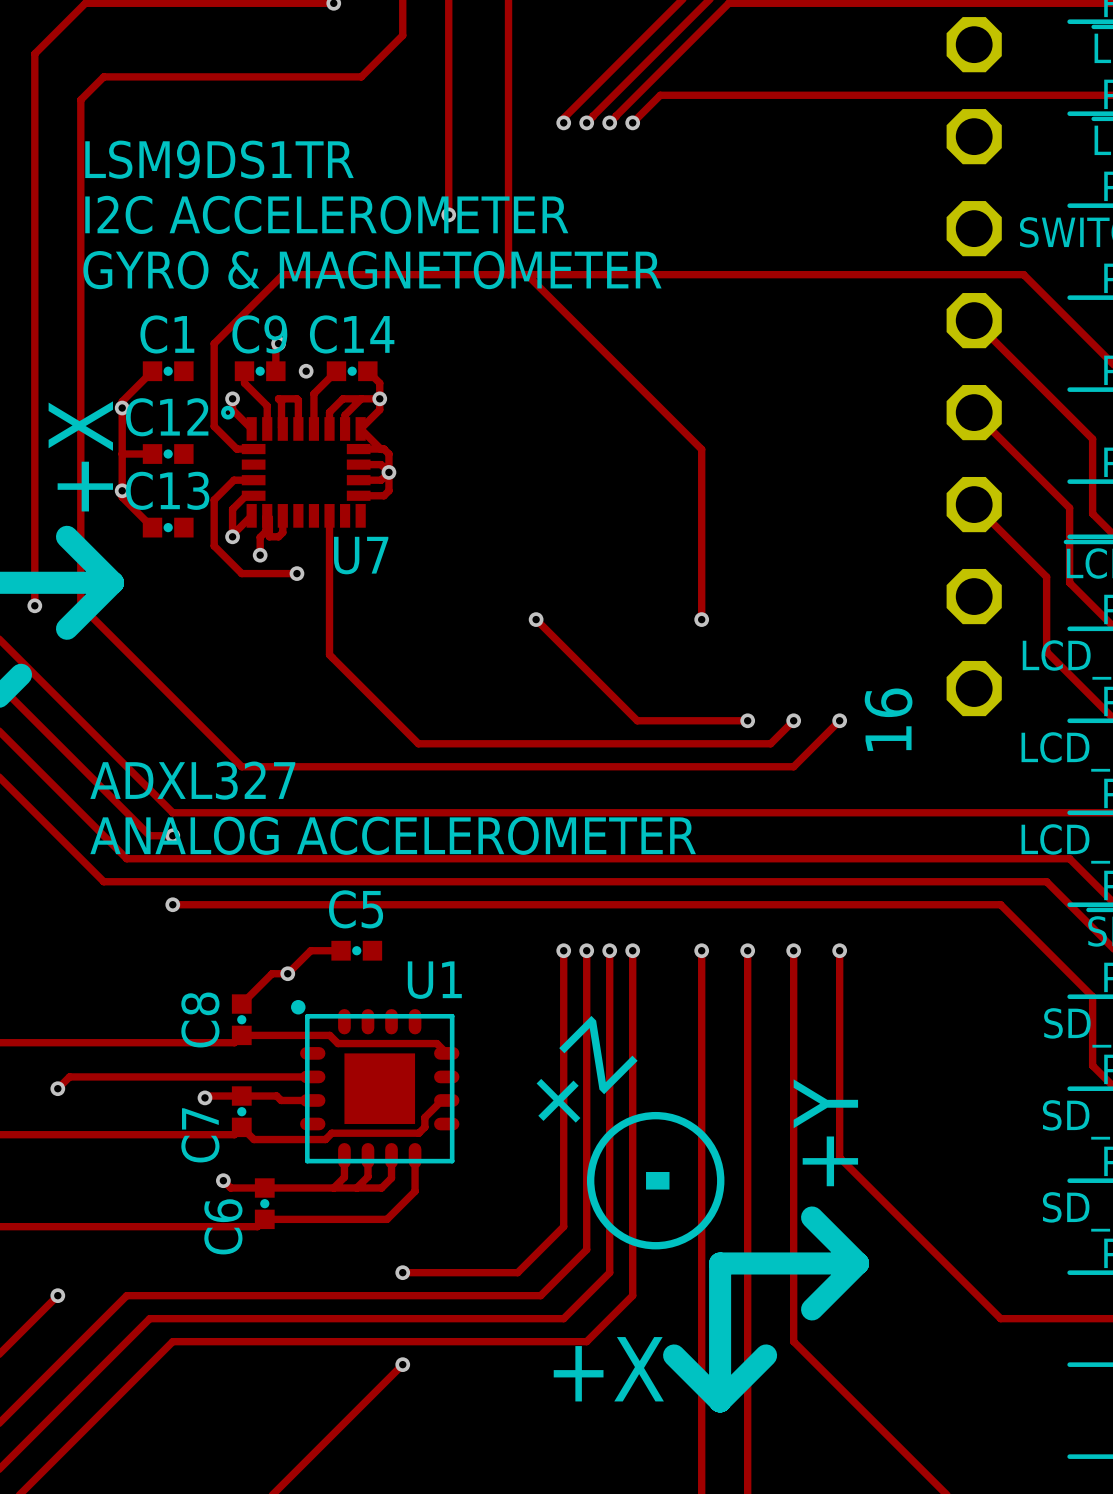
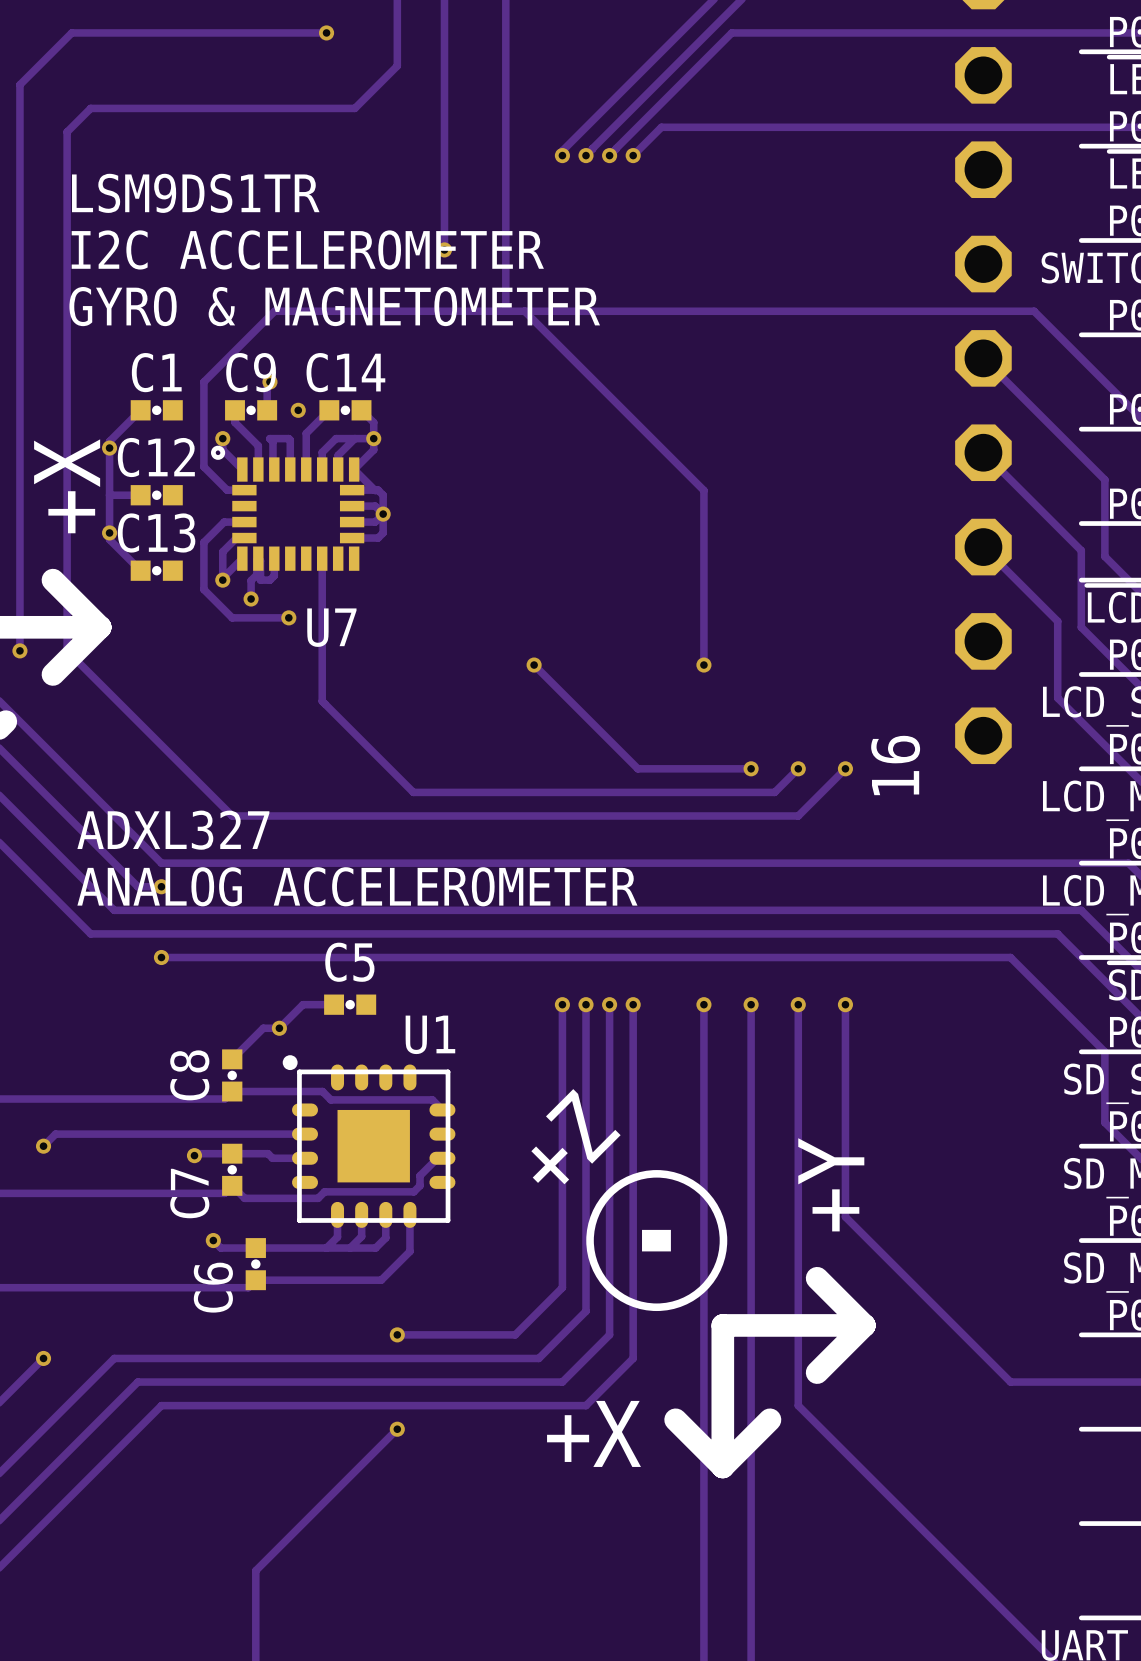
U7 name position: U7 (361, 555) -> U7 (331, 627)

